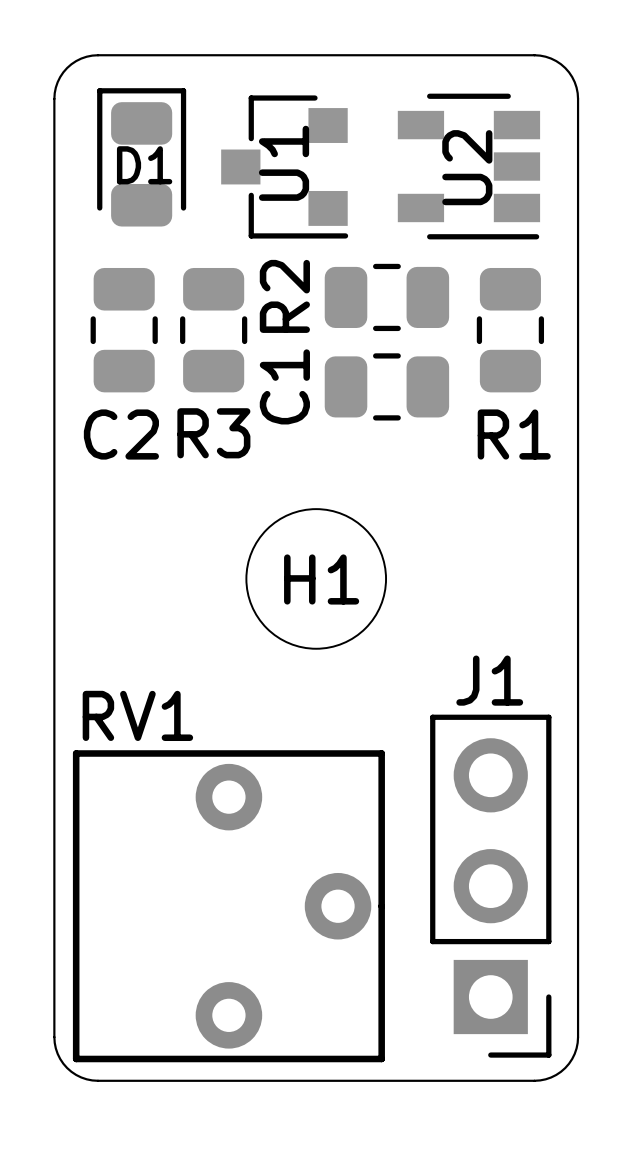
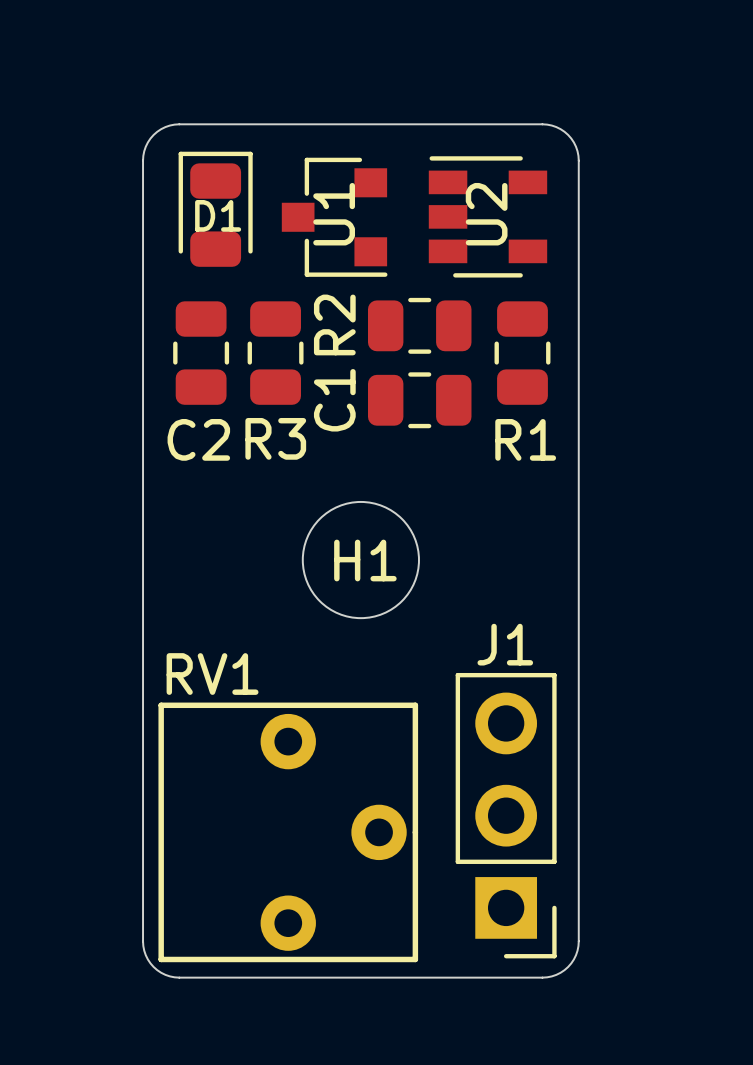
U2 rotation: 0° (468, 166) -> 180° (487, 216)

